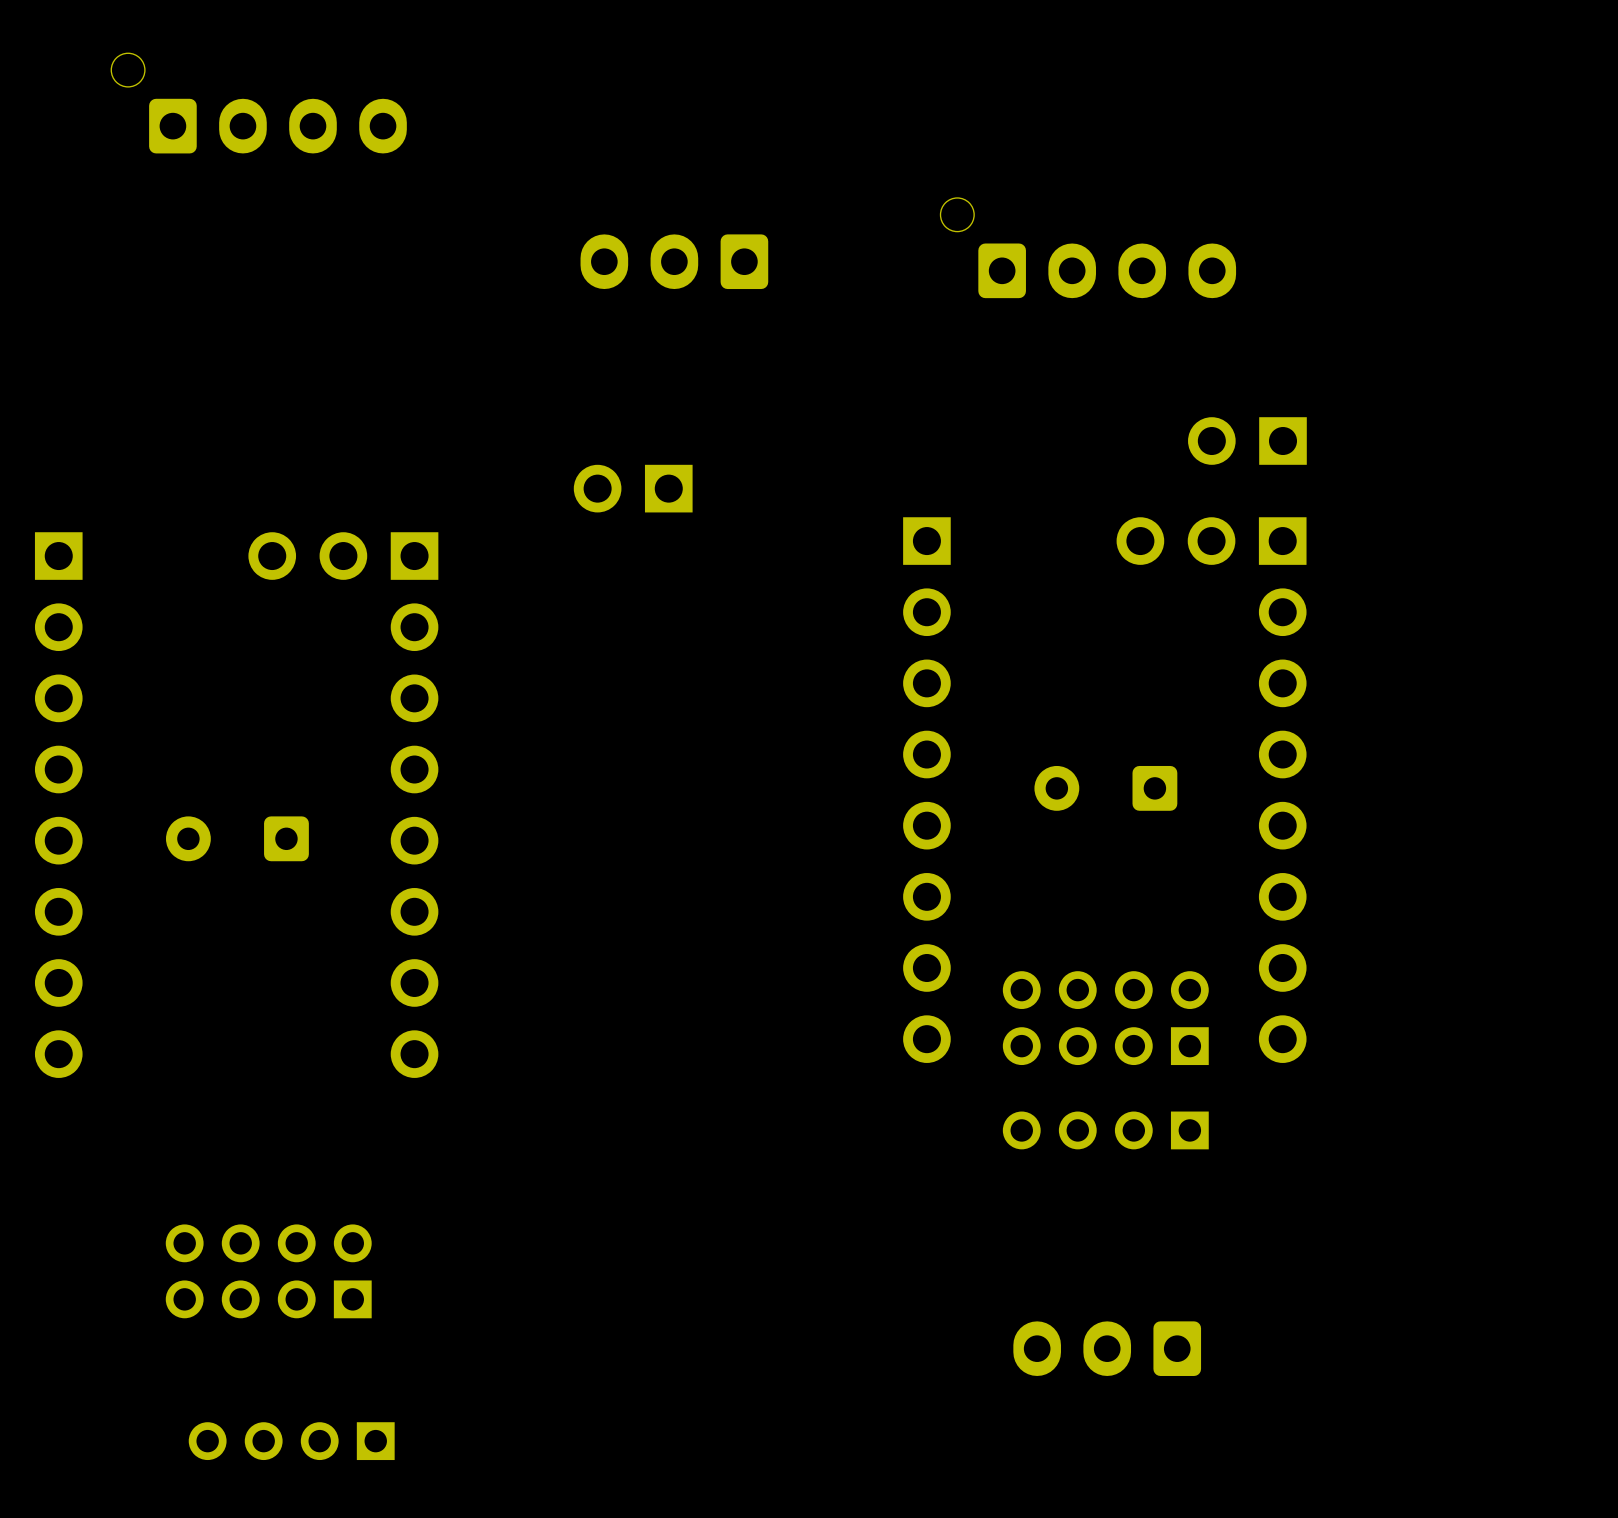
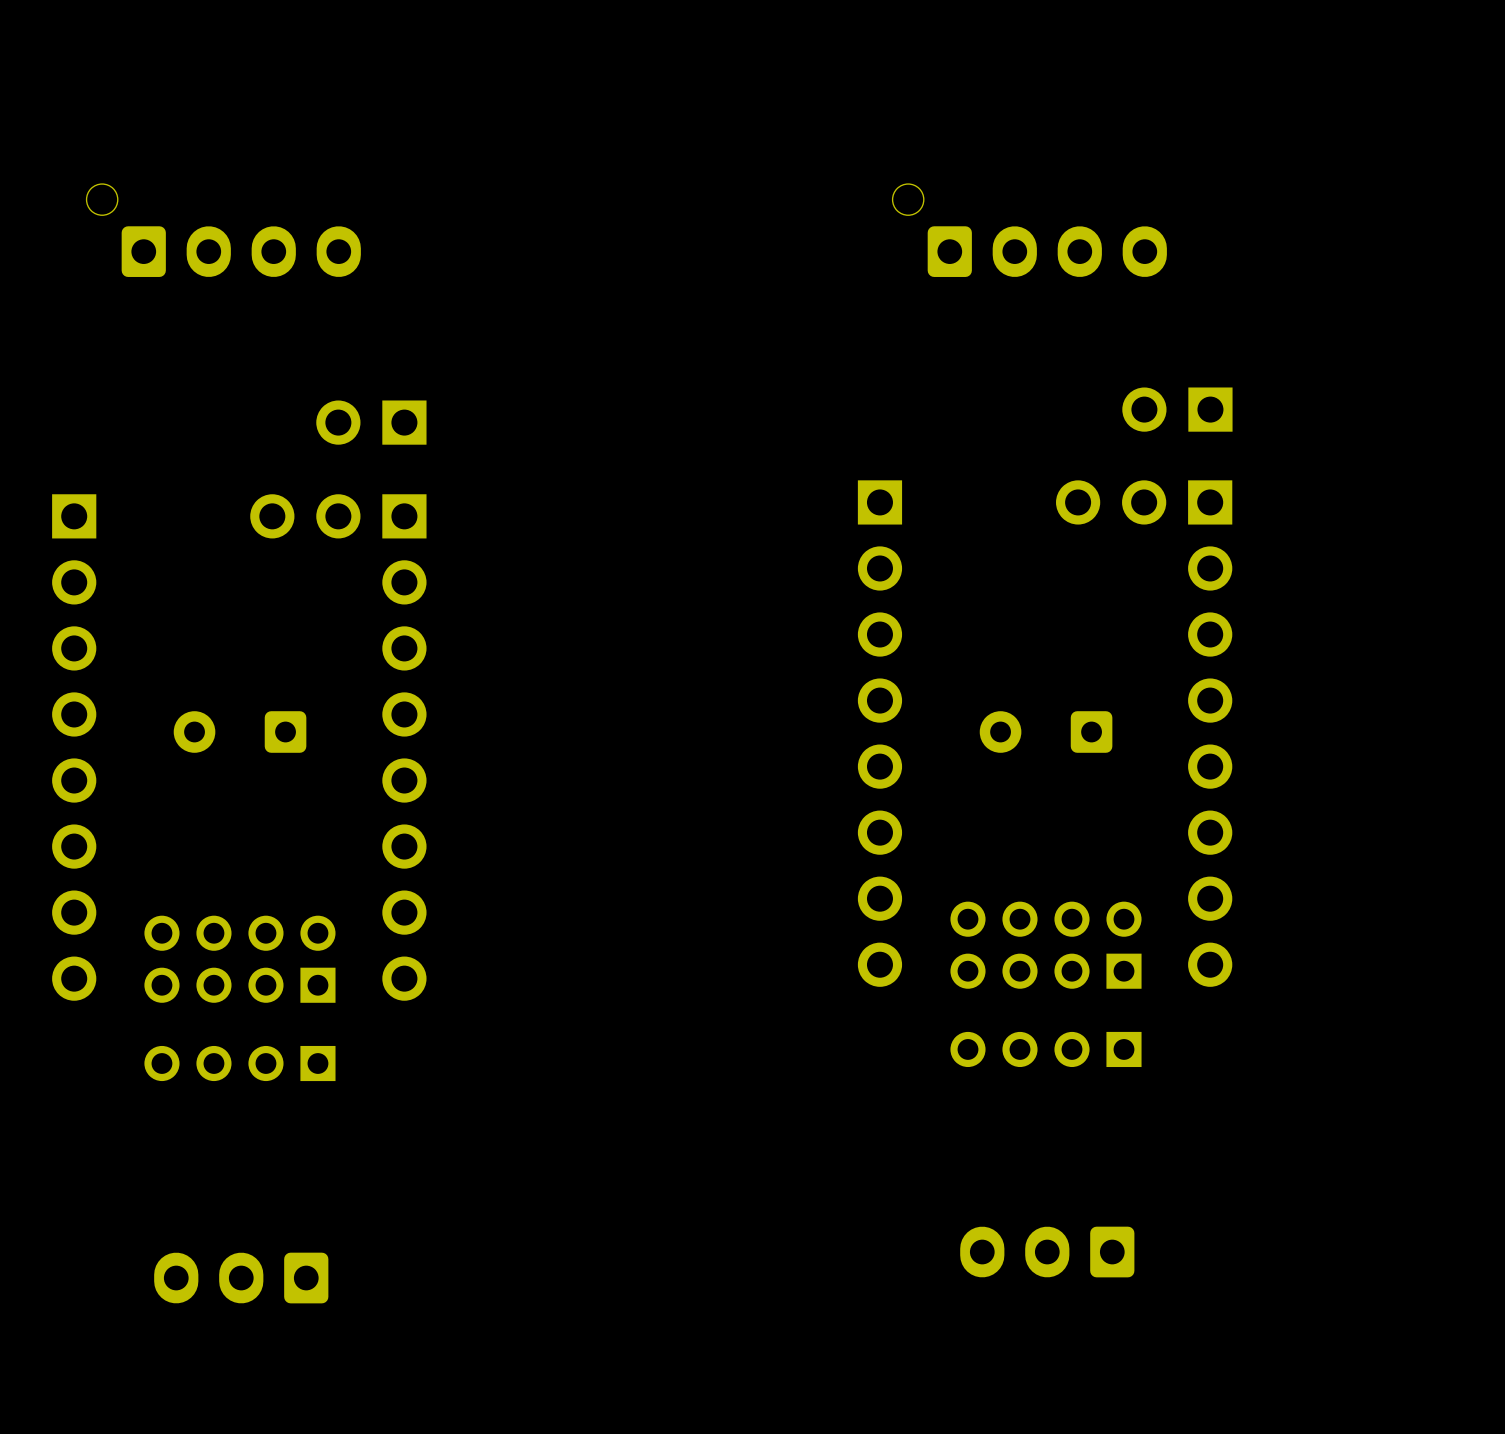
part position: (259, 103) -> (223, 230)
part: (674, 261) -> none
part position: (633, 488) -> (371, 422)
part position: (237, 838) -> (240, 732)
part position: (268, 1271) -> (239, 959)
part: none -> (241, 1278)
part position: (291, 1441) -> (239, 1063)

